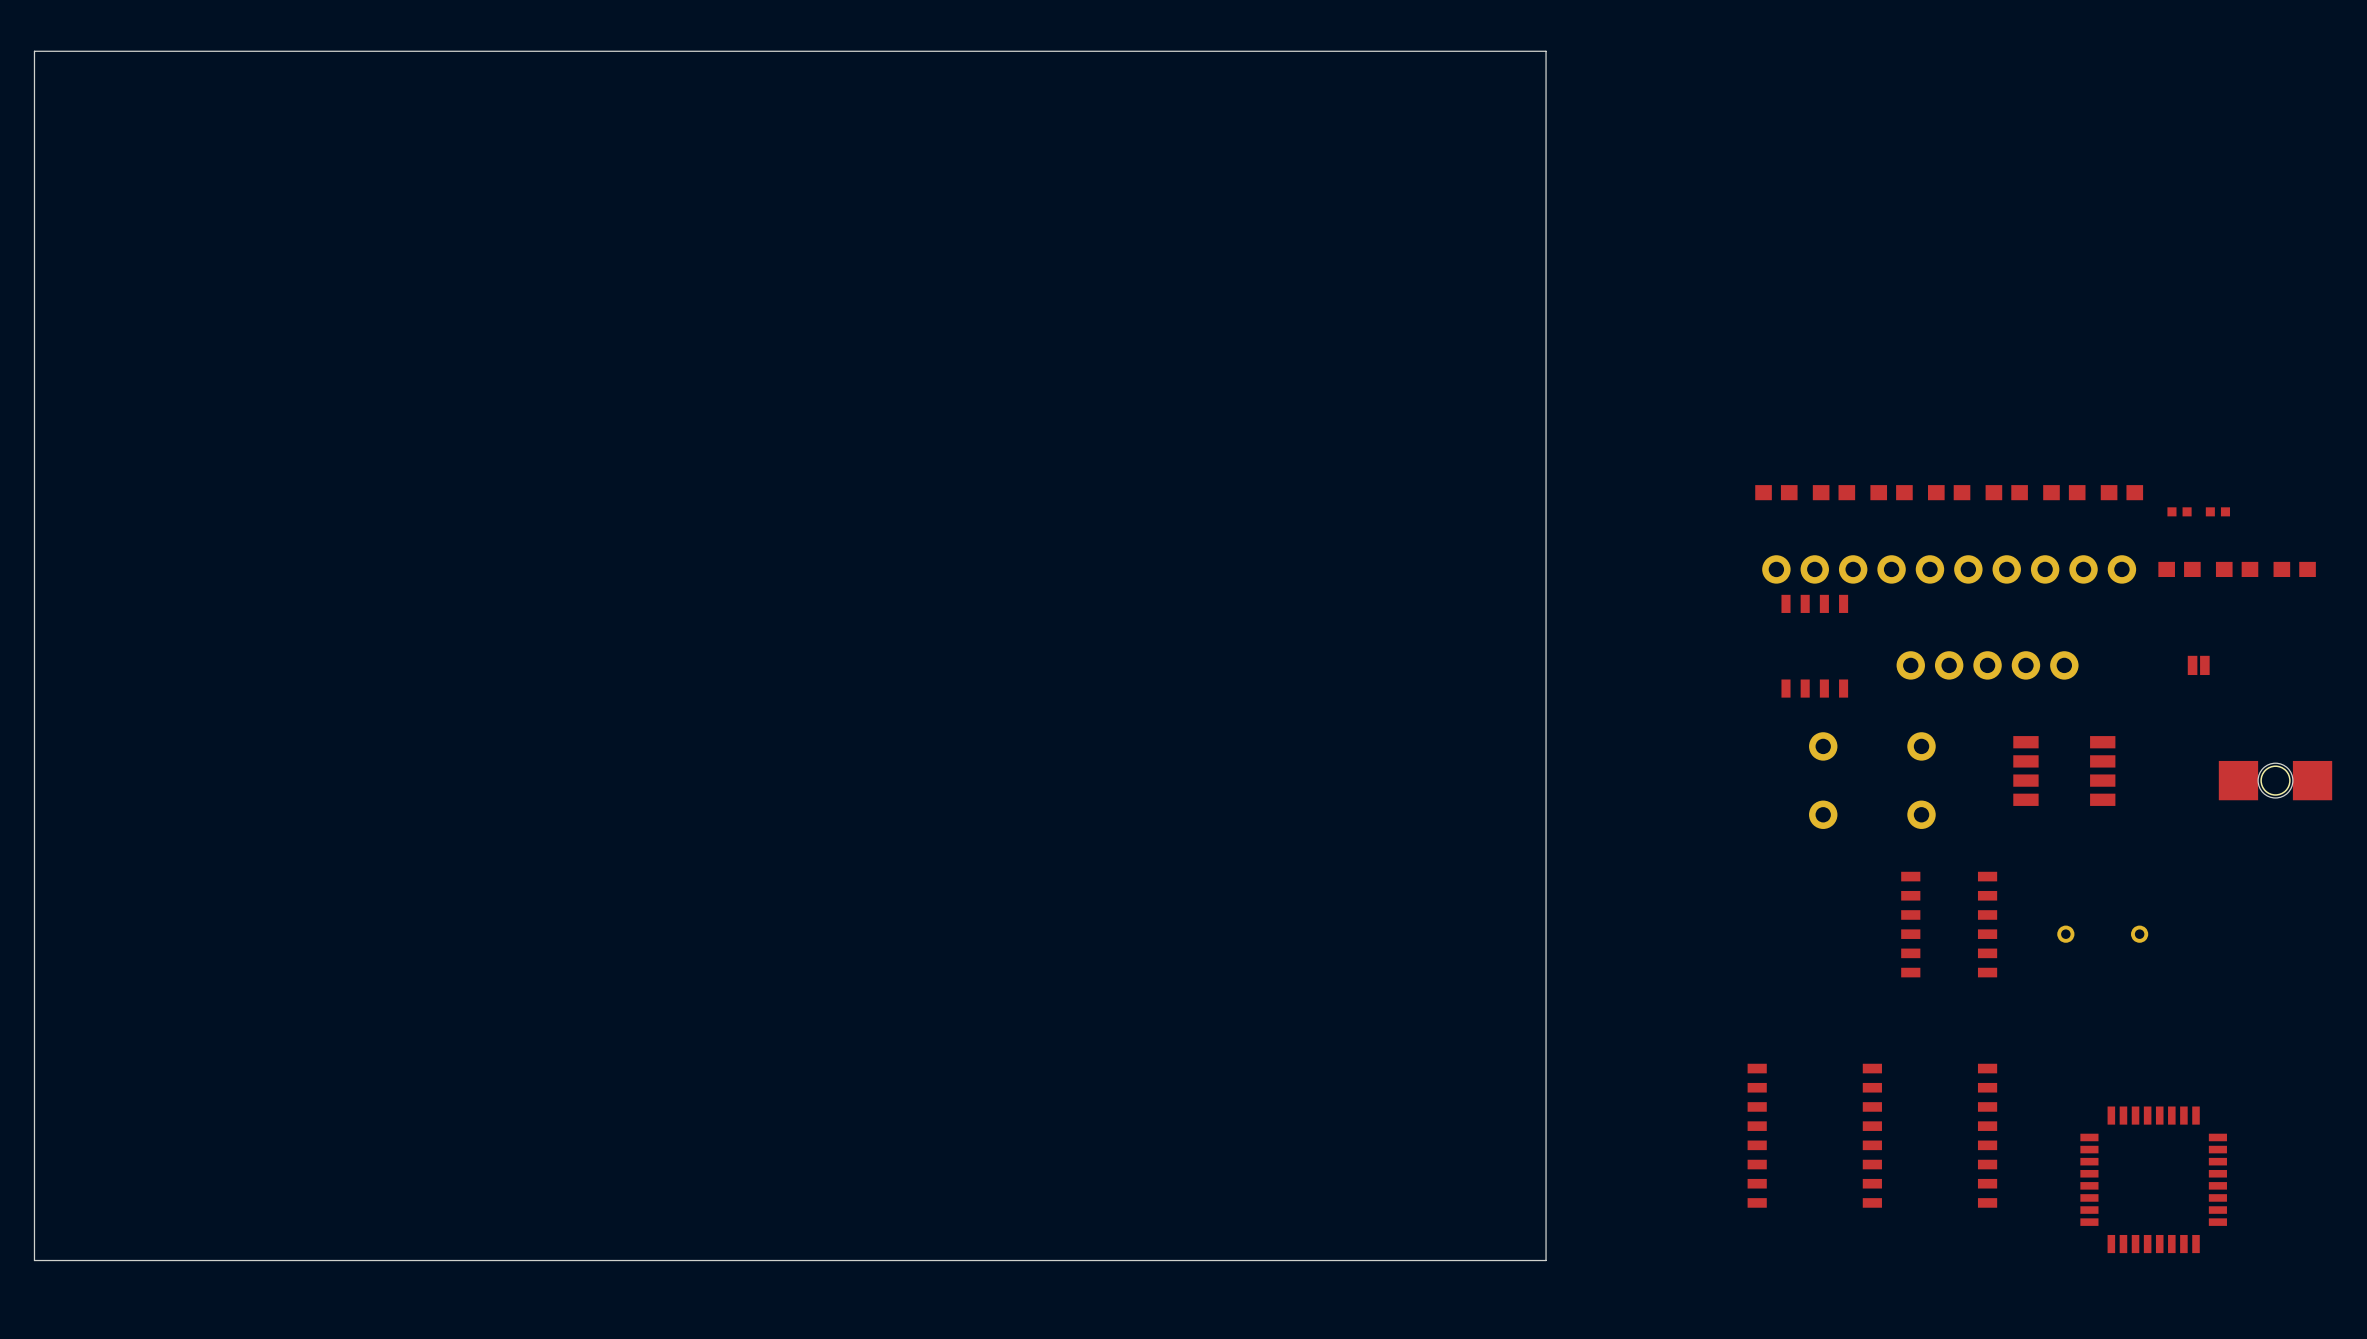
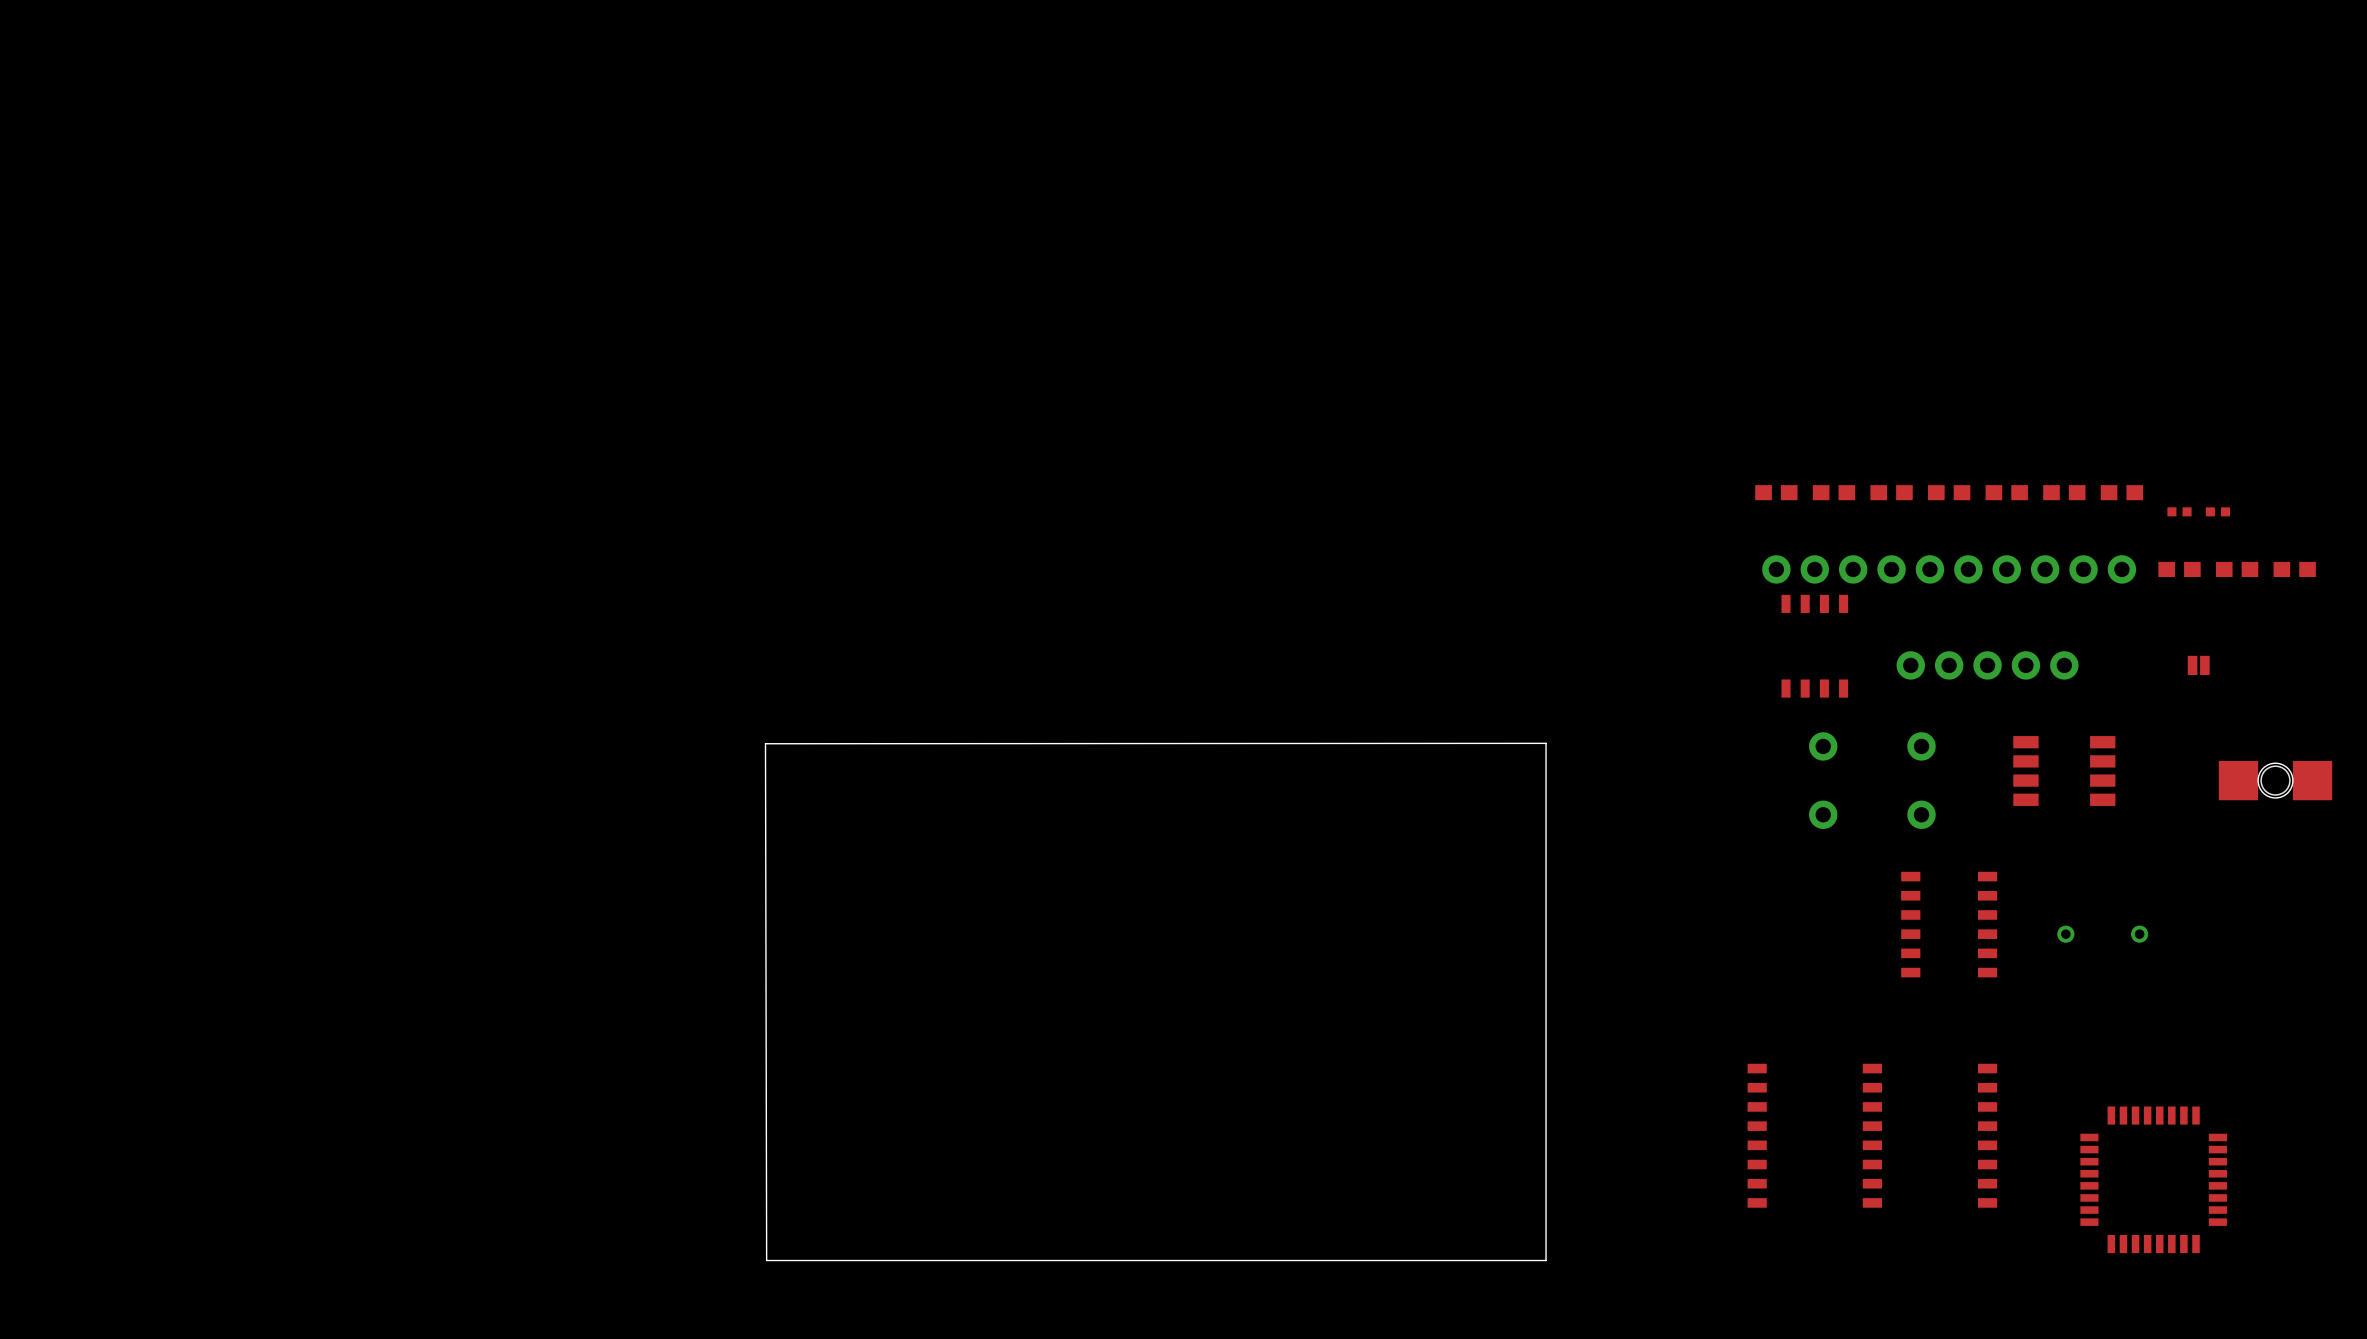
board edge: (1546, 743) (1546, 51) (34, 51) (34, 1260) (766, 1260) -> (1546, 743) (765, 743) (766, 1260)

